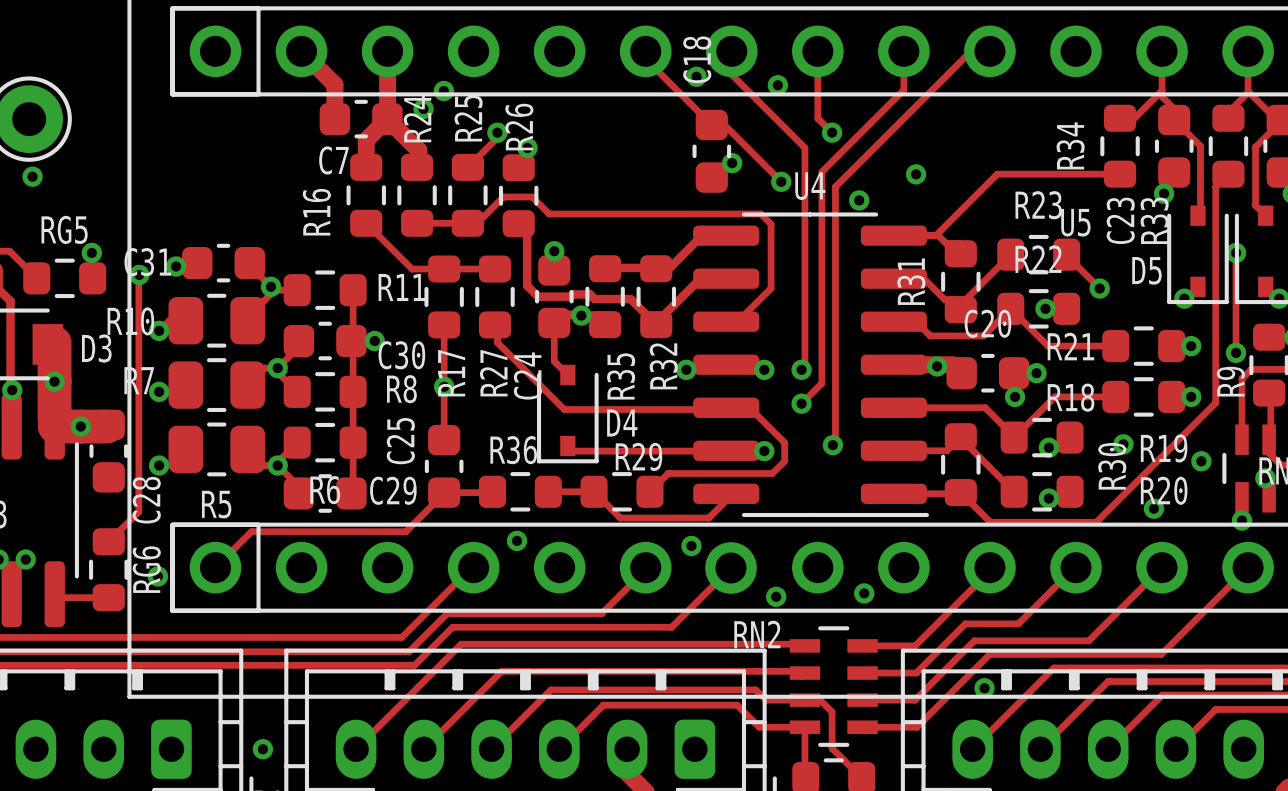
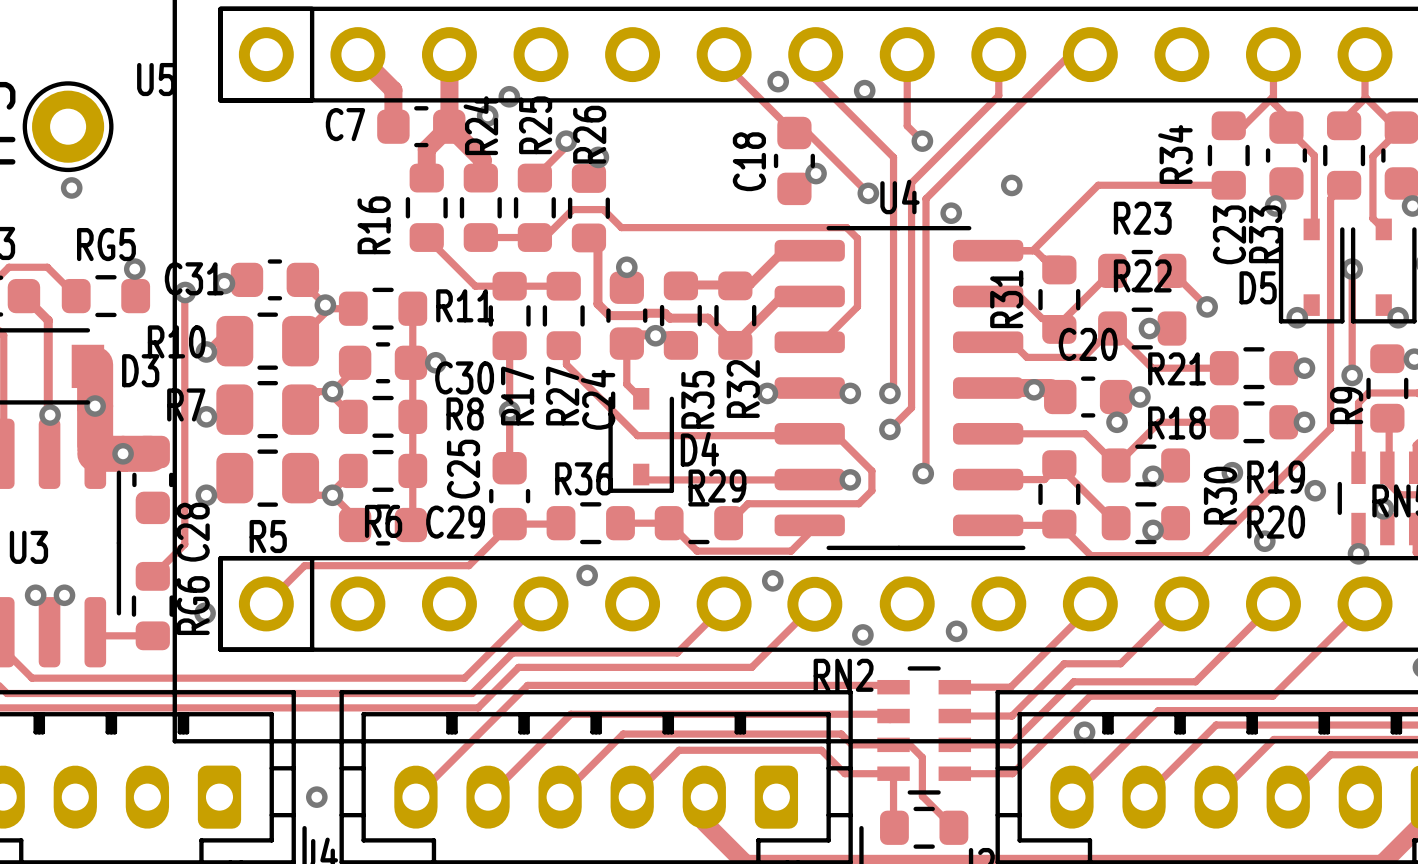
C18 name position: C18 (697, 59) -> C18 (749, 161)
C7 name position: C7 (333, 160) -> C7 (345, 124)
U5 name position: U5 (1075, 222) -> U5 (156, 79)

